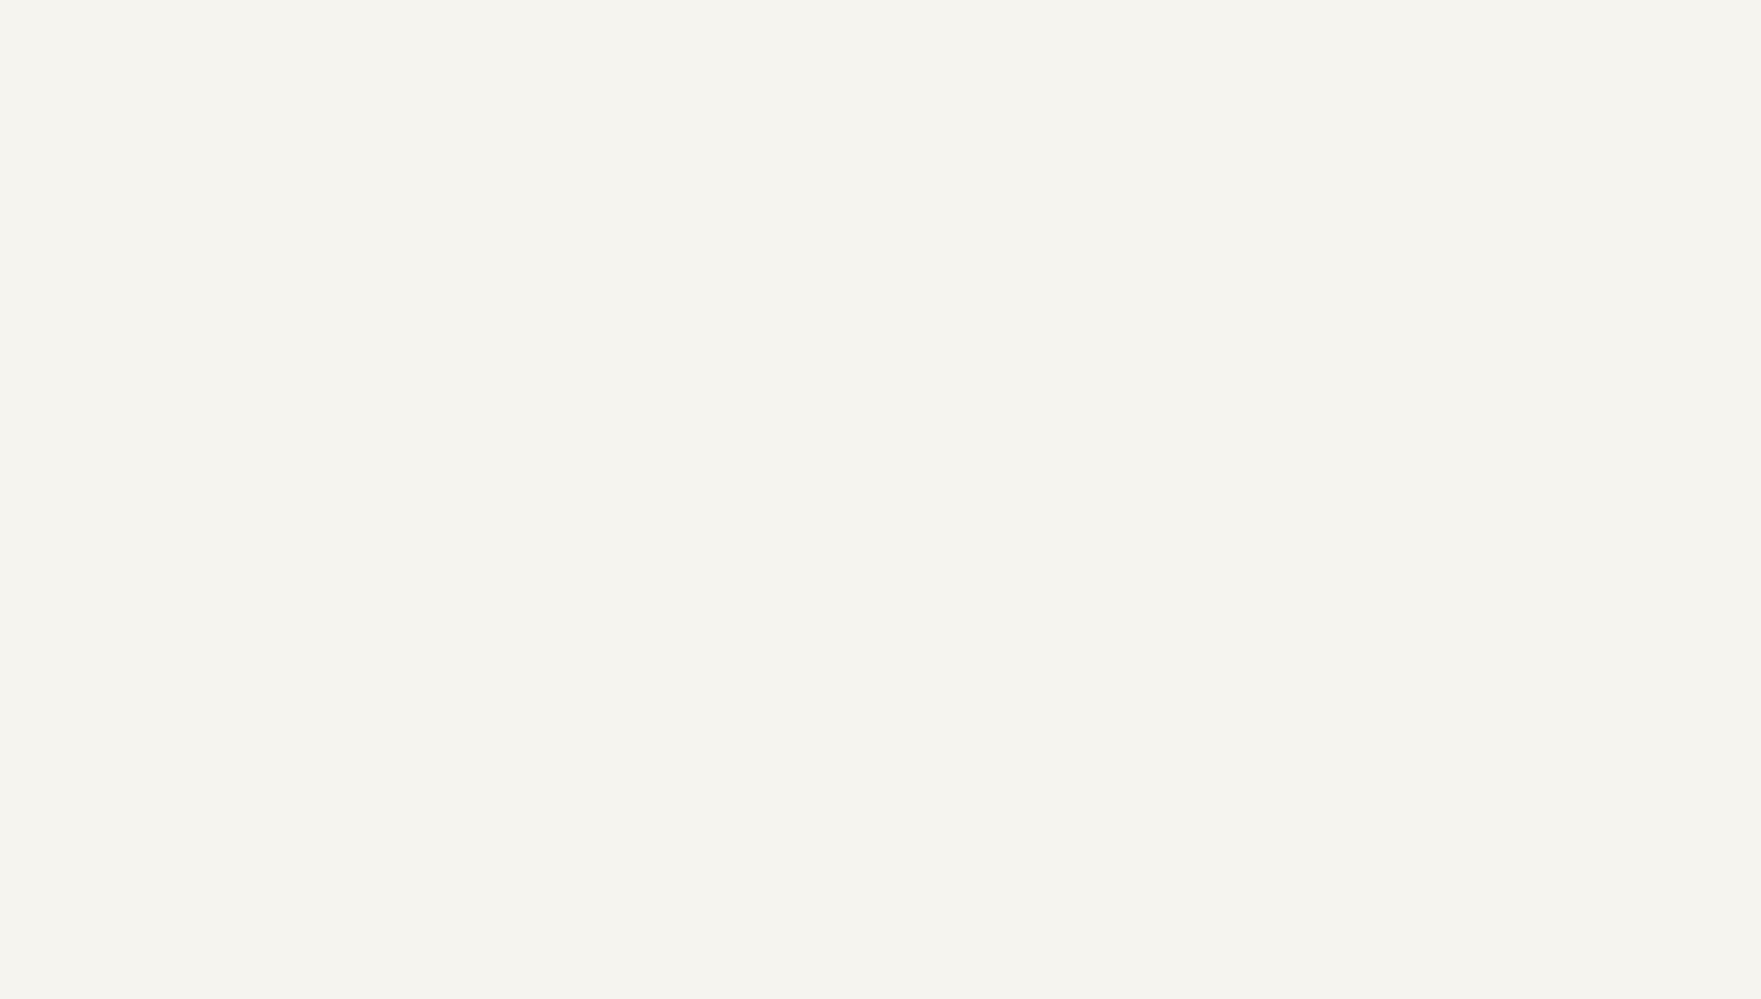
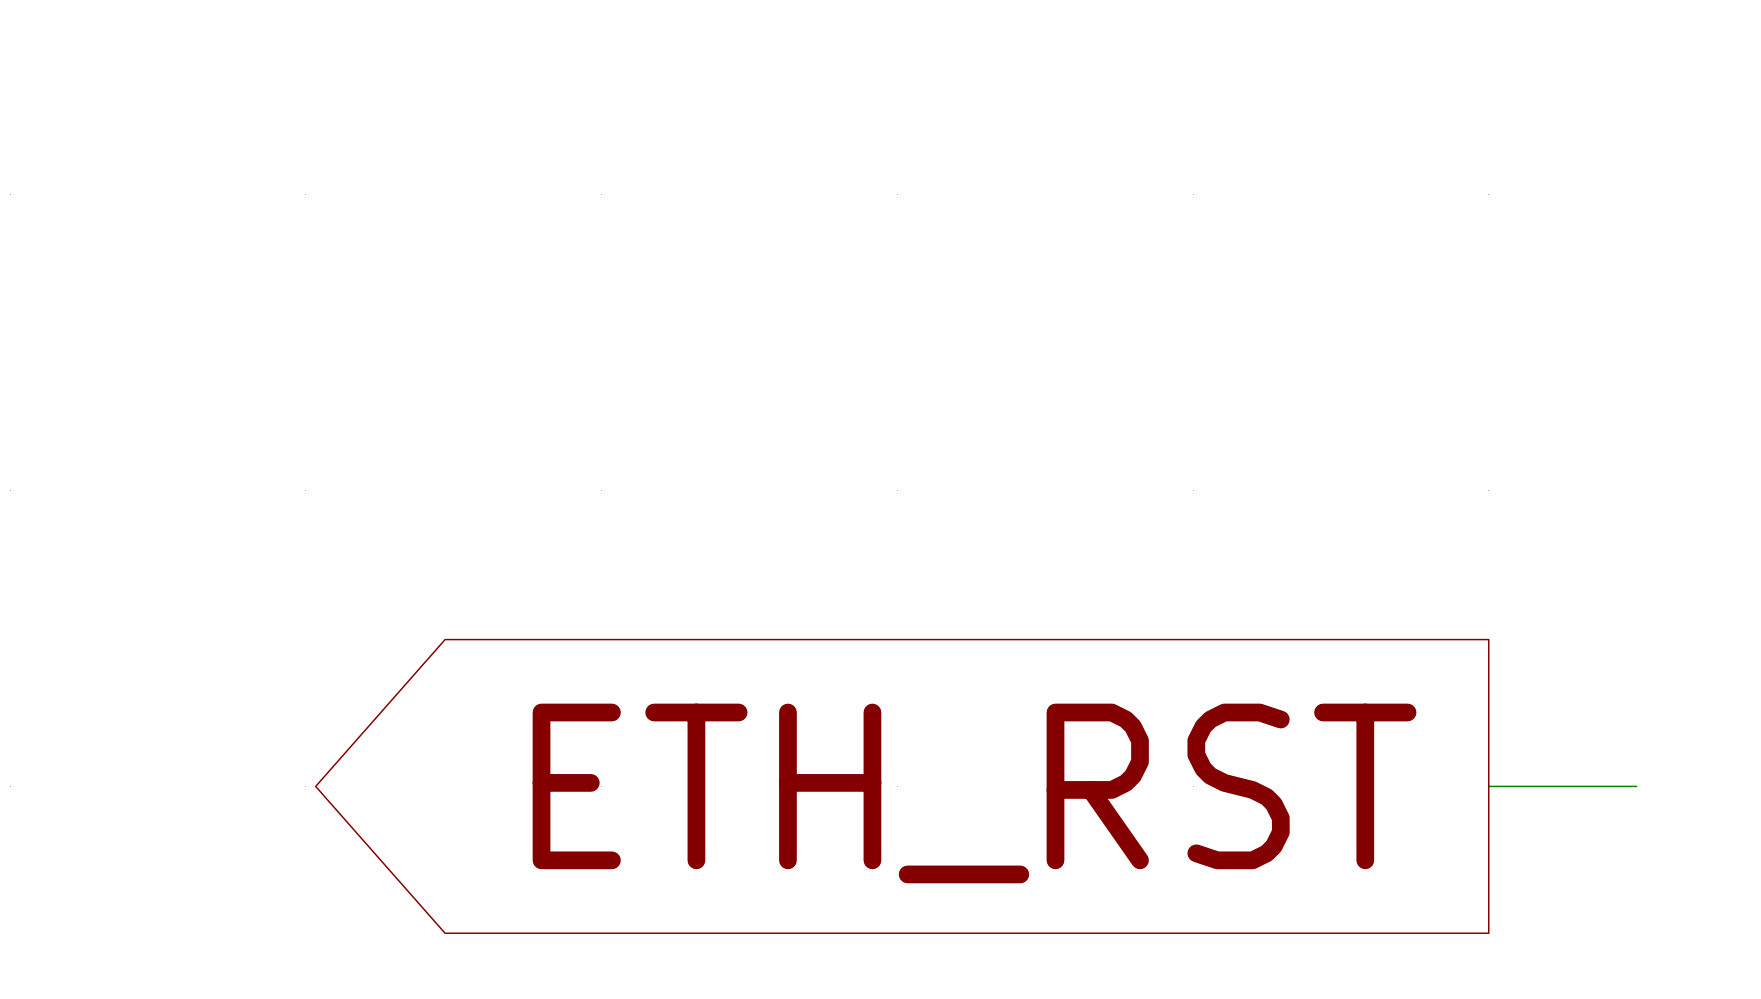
wire: none -> (1488, 786) (1636, 786)
global label: none -> ETH_RST (974, 793)

